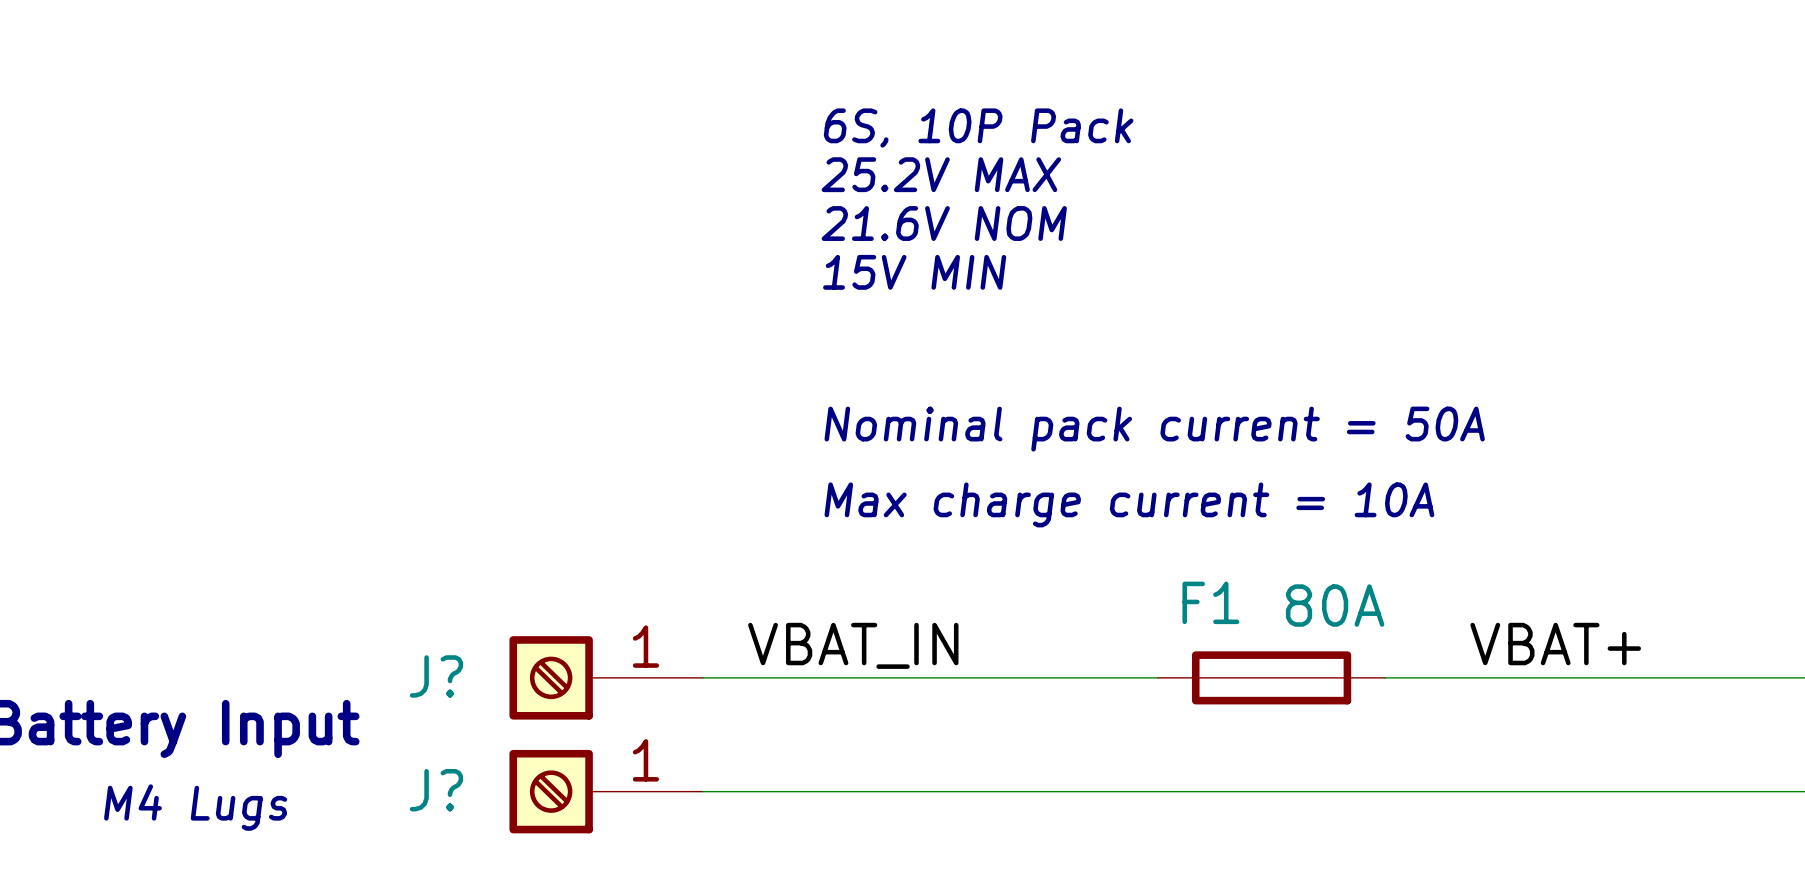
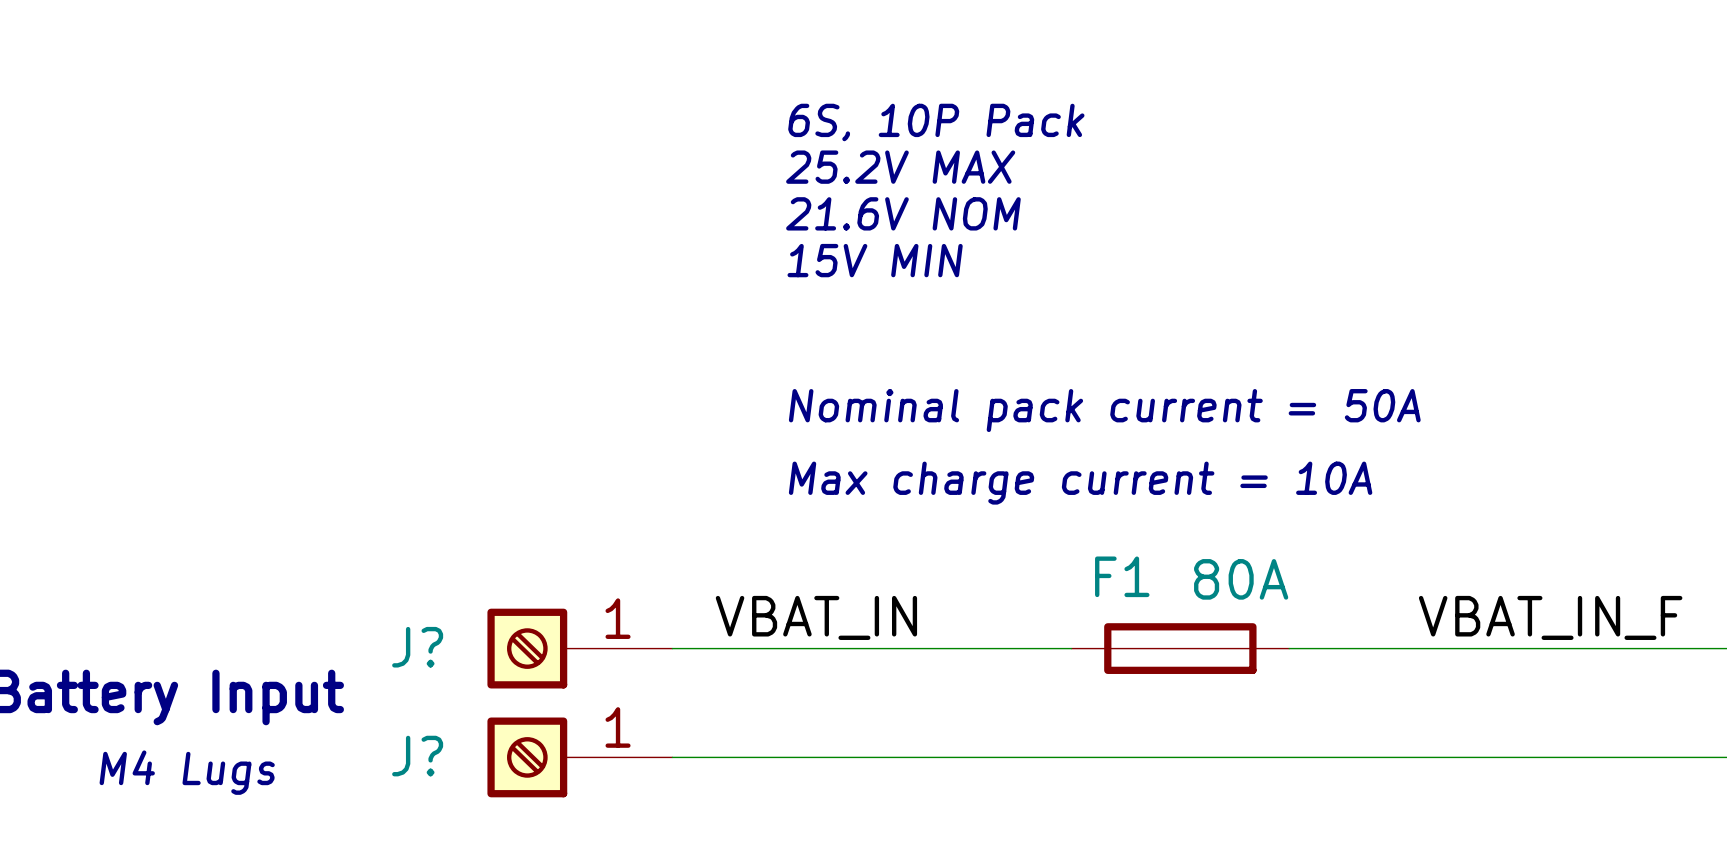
label: VBAT+ (1555, 644) -> none
label: none -> VBAT_IN_F (1550, 617)
F1 position: (1271, 677) -> (1180, 648)

